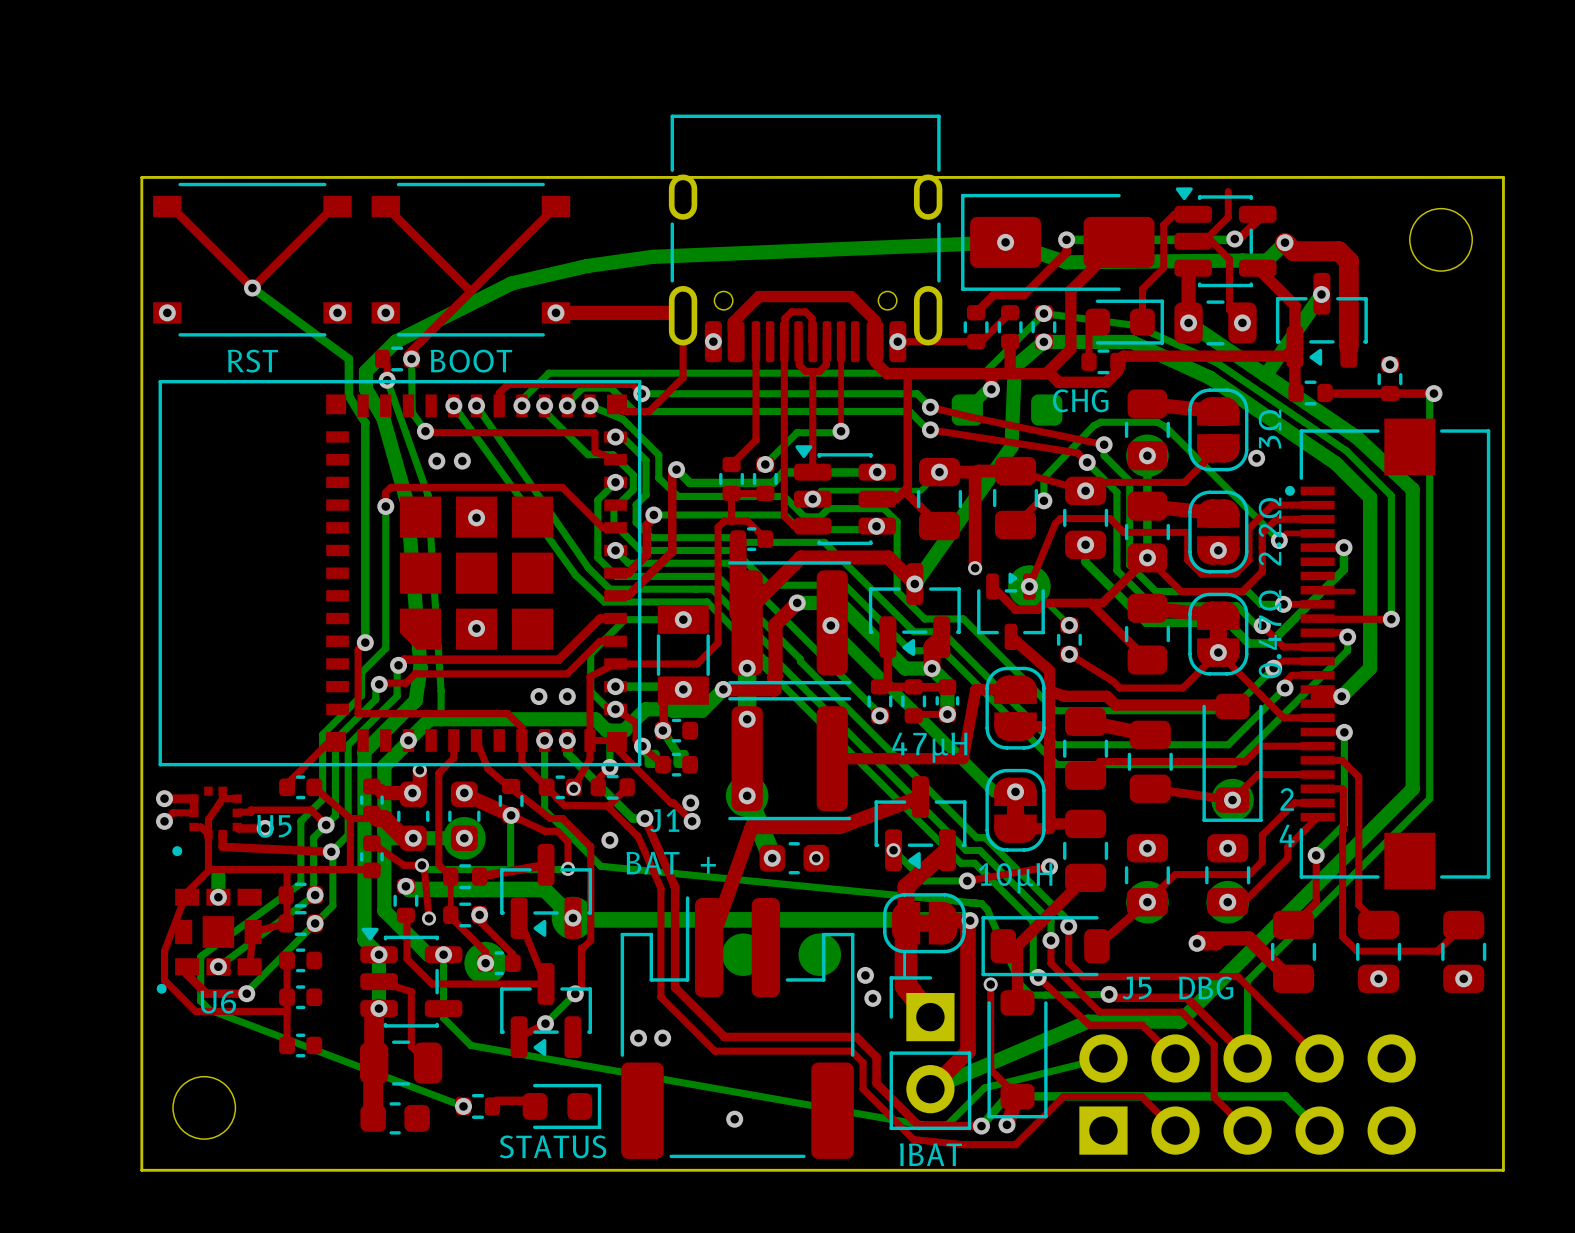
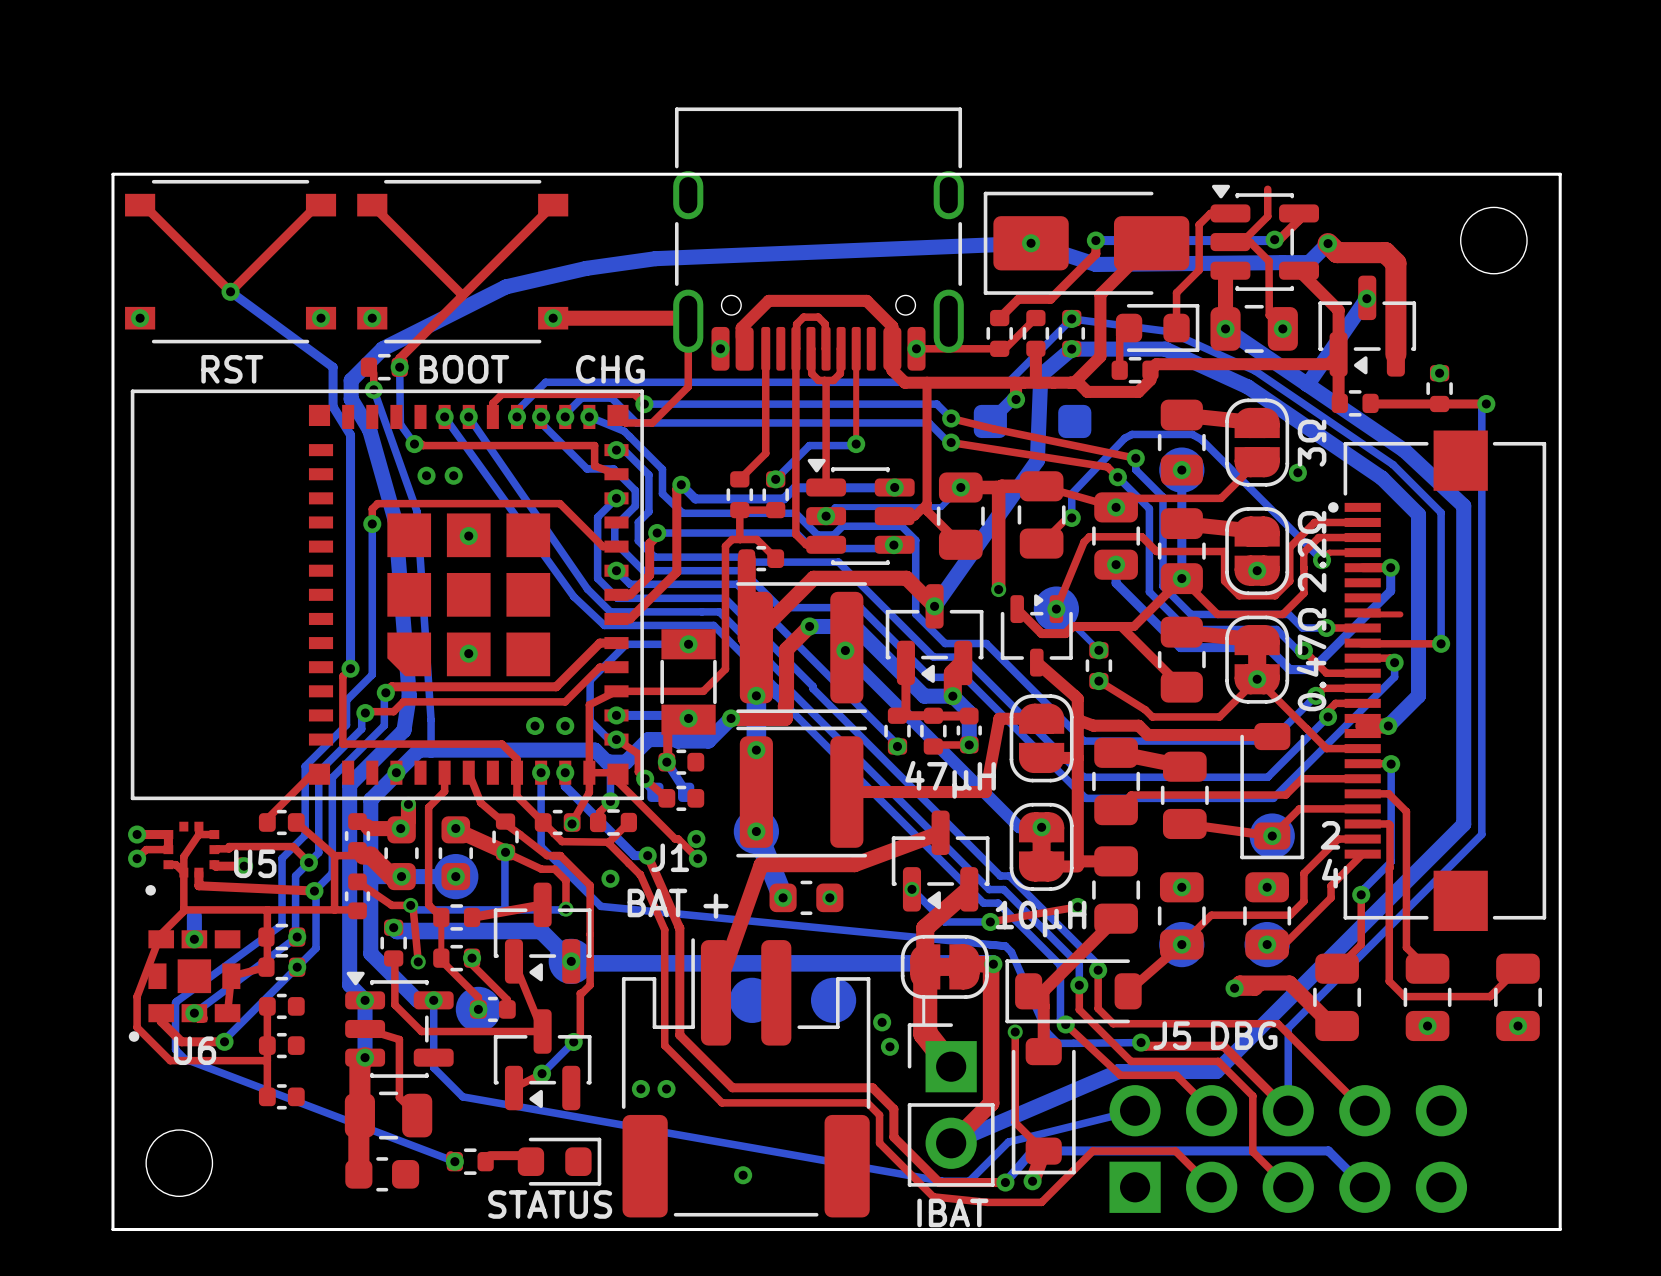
text position: CHG (1080, 400) -> CHG (610, 369)

